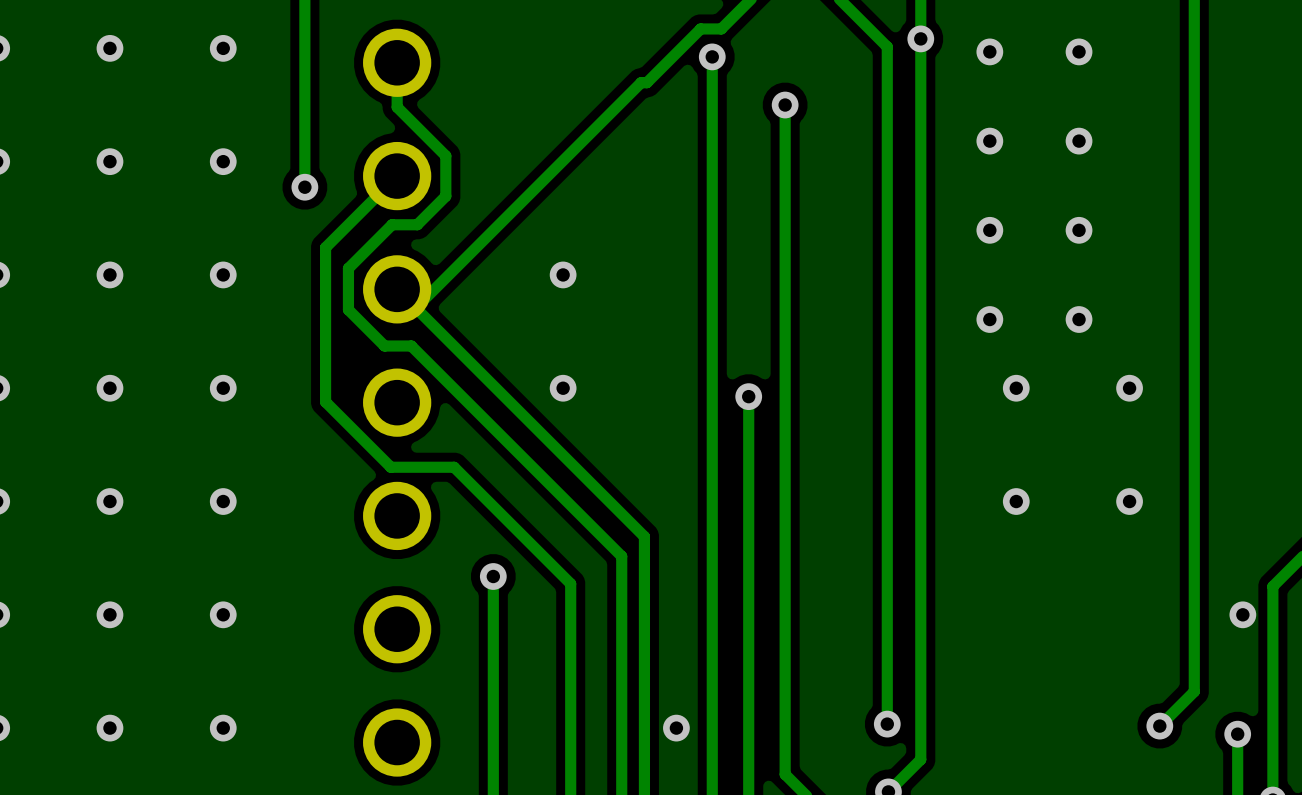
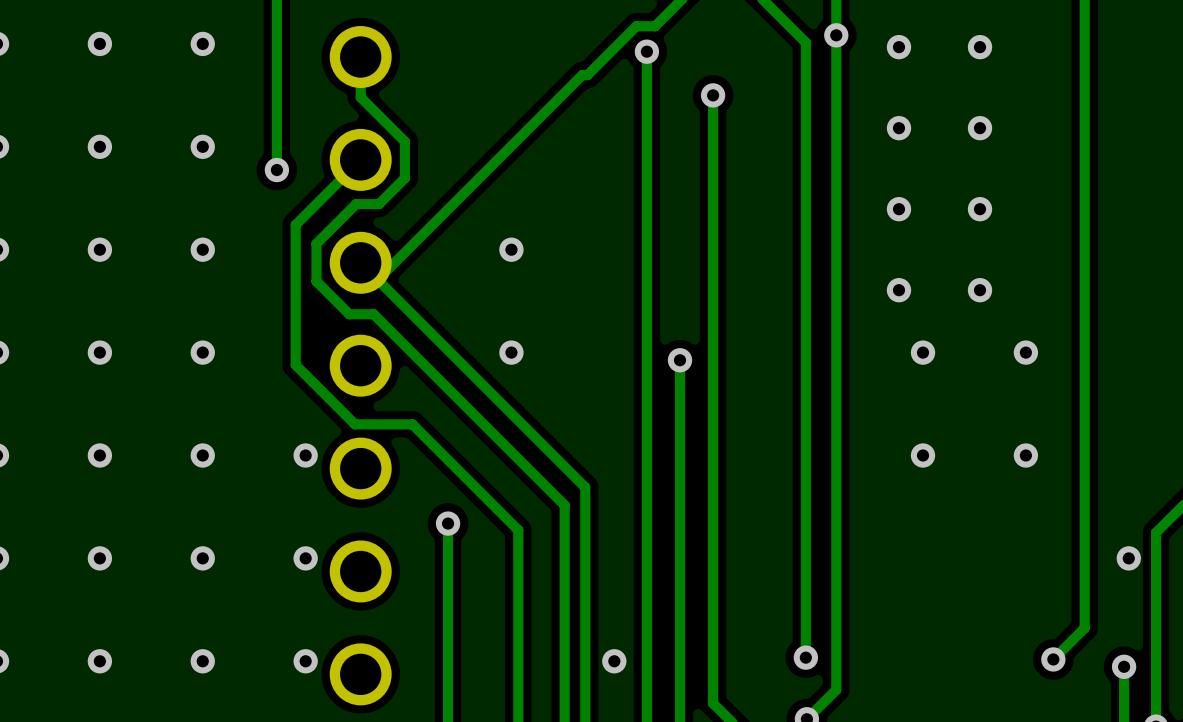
via: none -> (305, 455)
via: none -> (305, 558)
via: none -> (305, 661)

